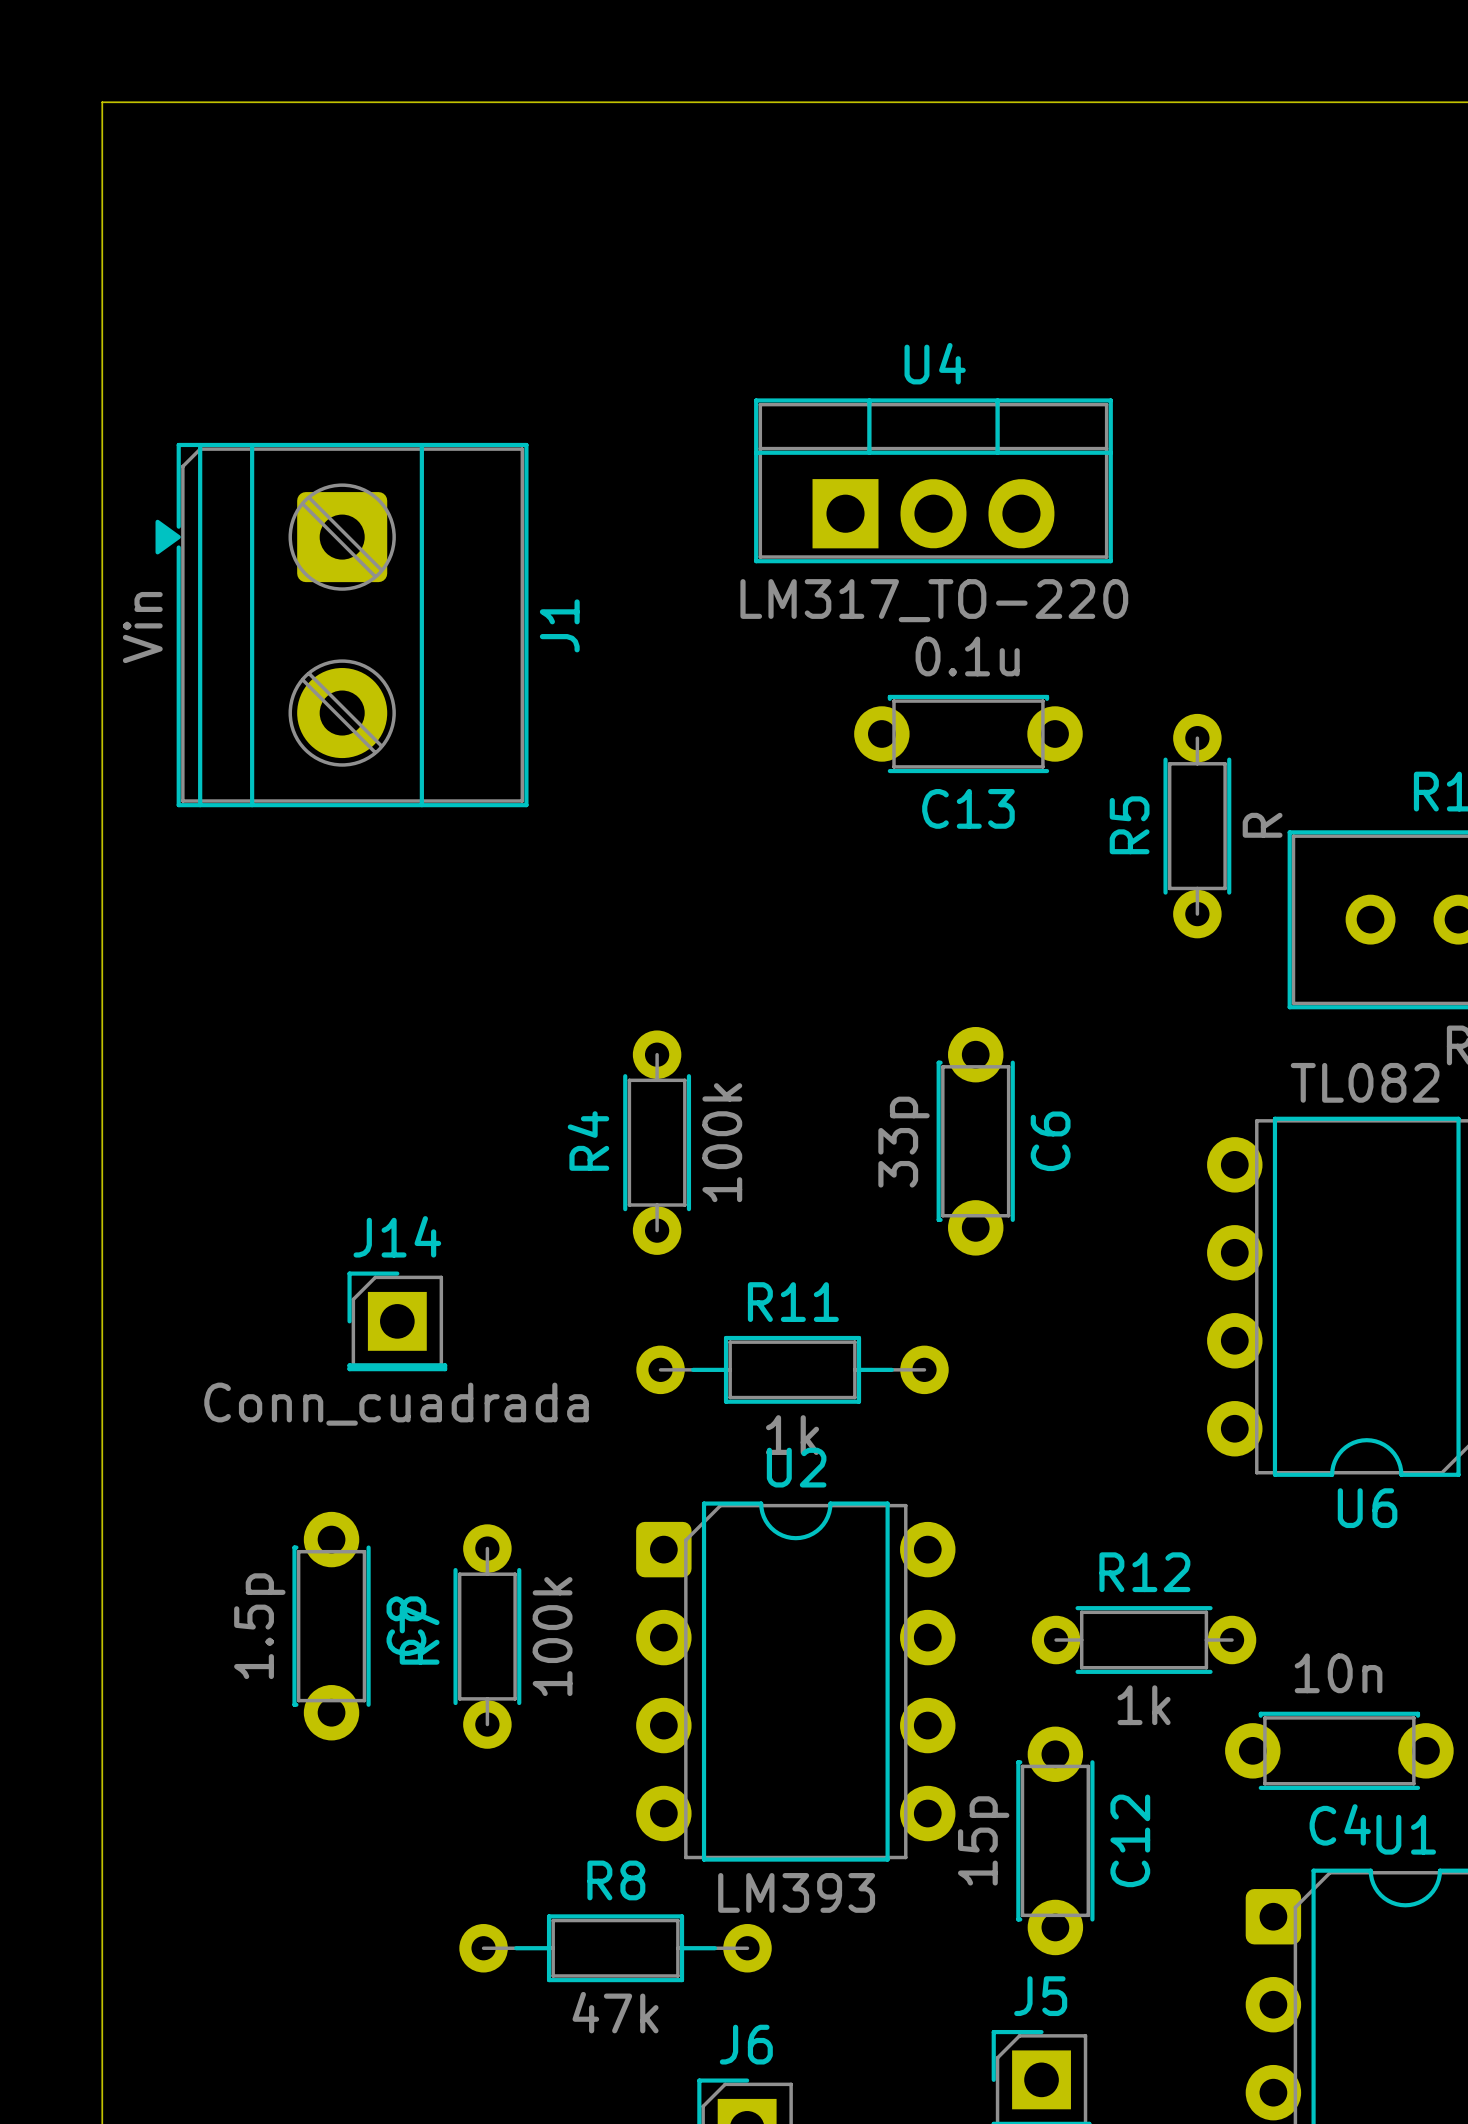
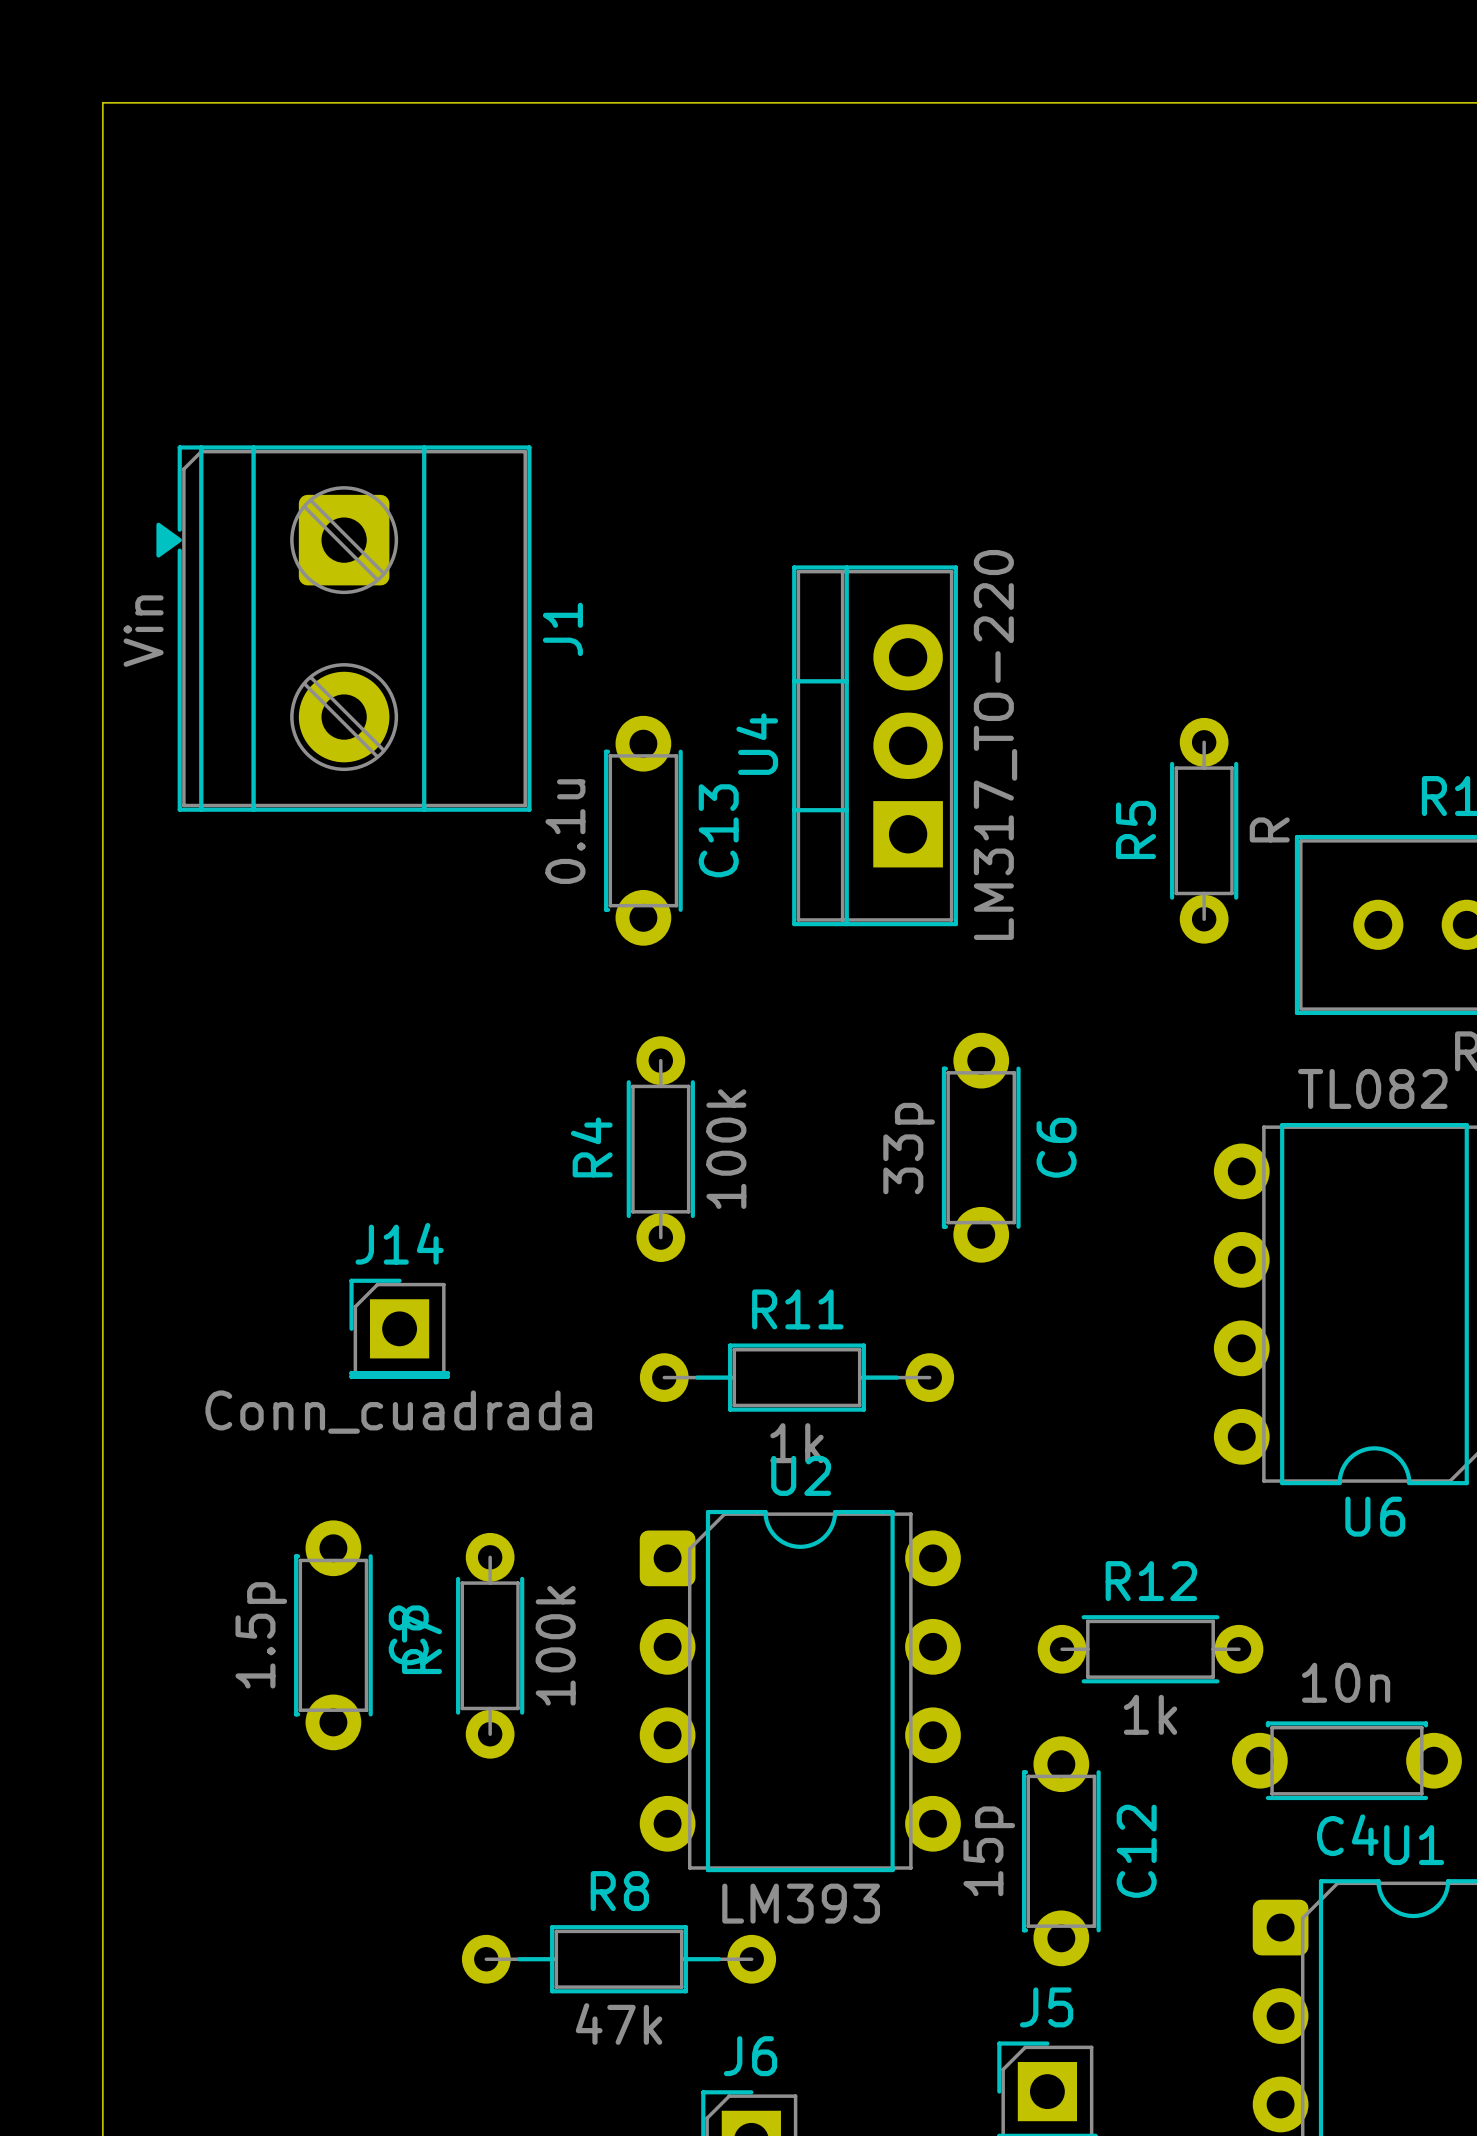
U4 rotation: 0° (933, 480) -> 90° counterclockwise (875, 745)
U4 position: (933, 480) -> (875, 745)
C13 rotation: 0° (968, 733) -> 90° counterclockwise (643, 830)
C13 position: (968, 733) -> (643, 830)

